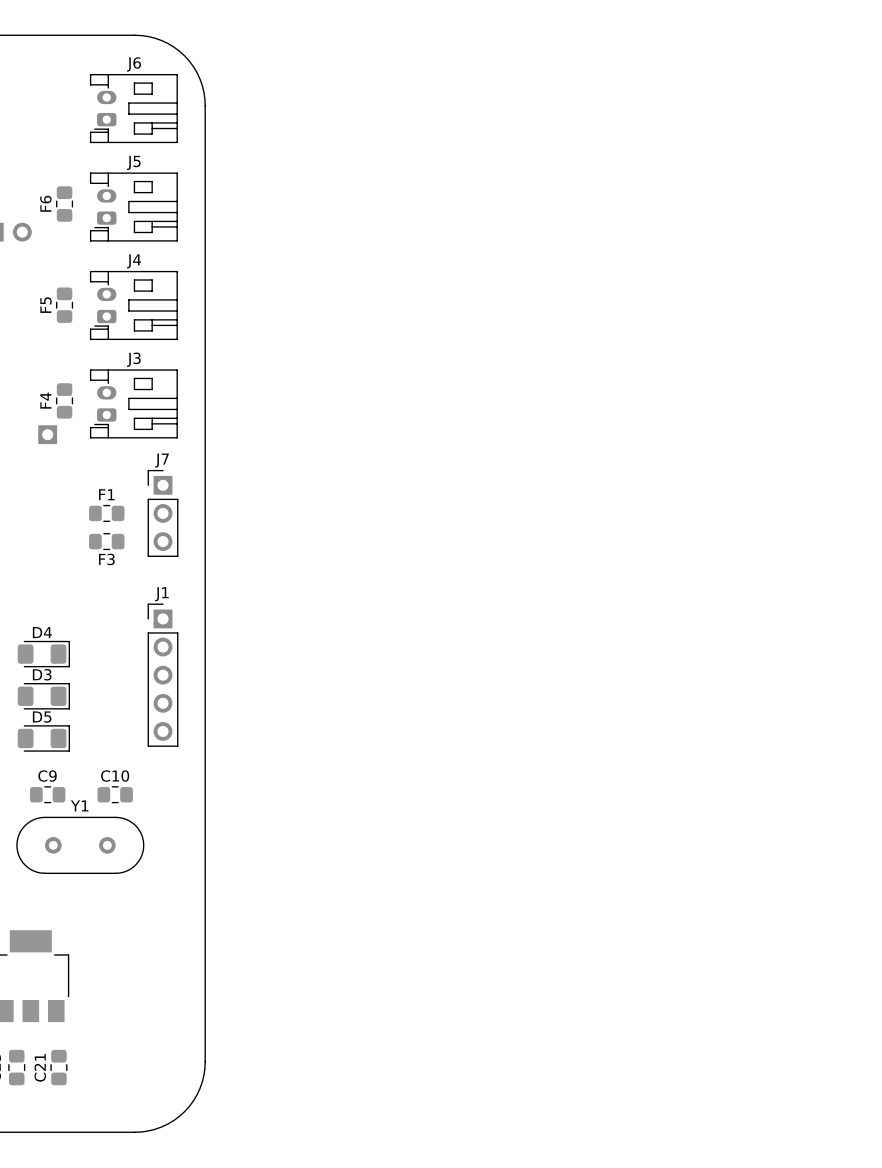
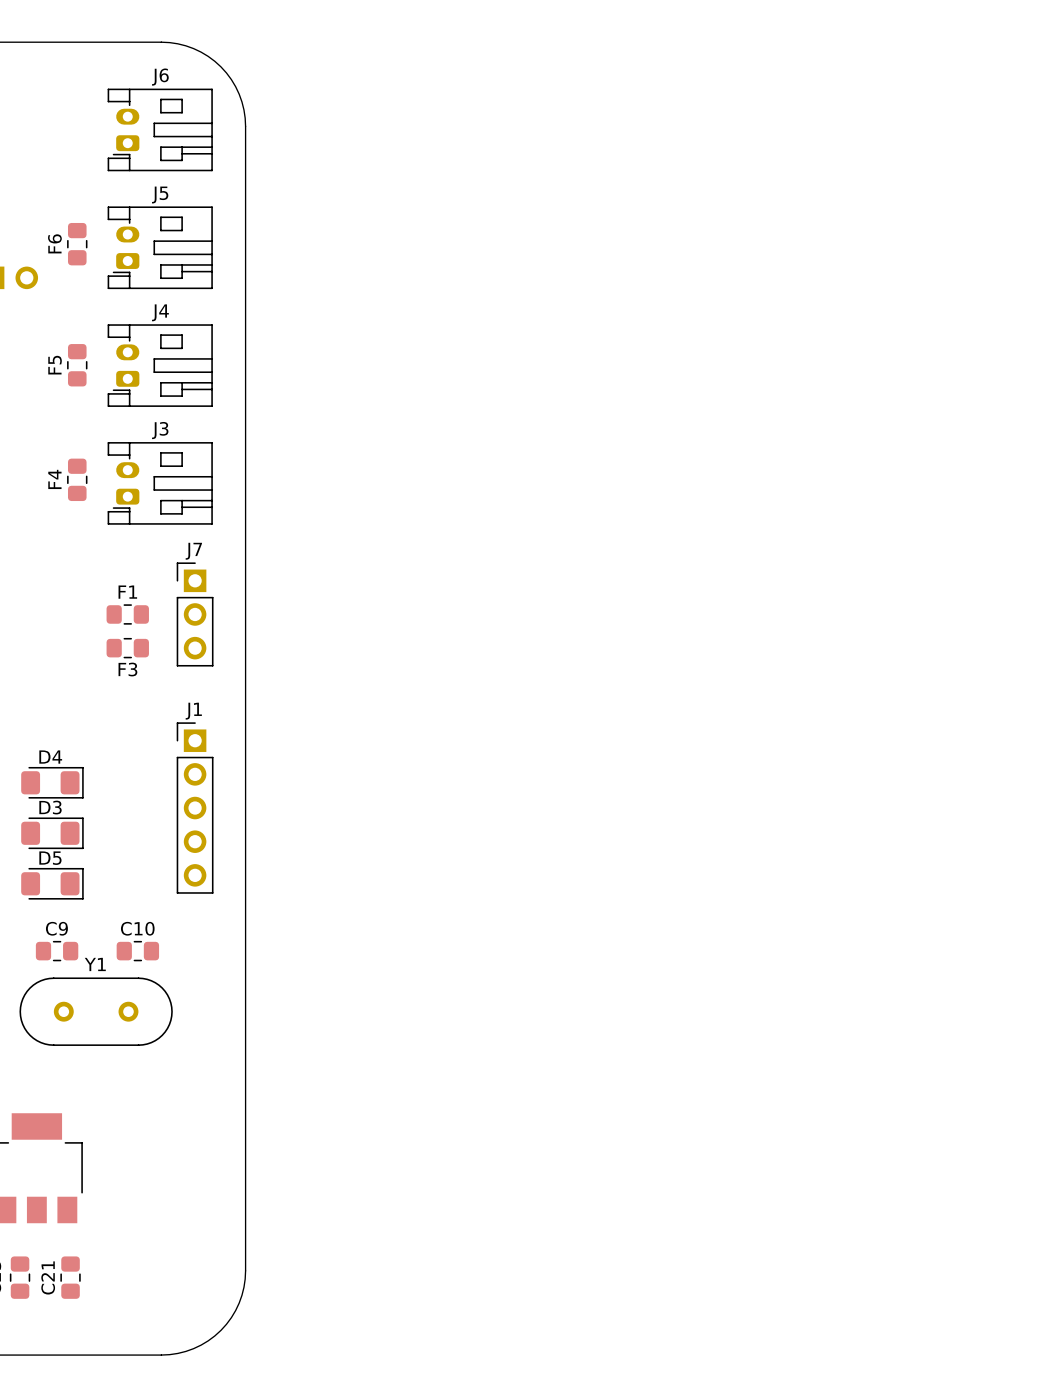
part: (47, 434) -> none

